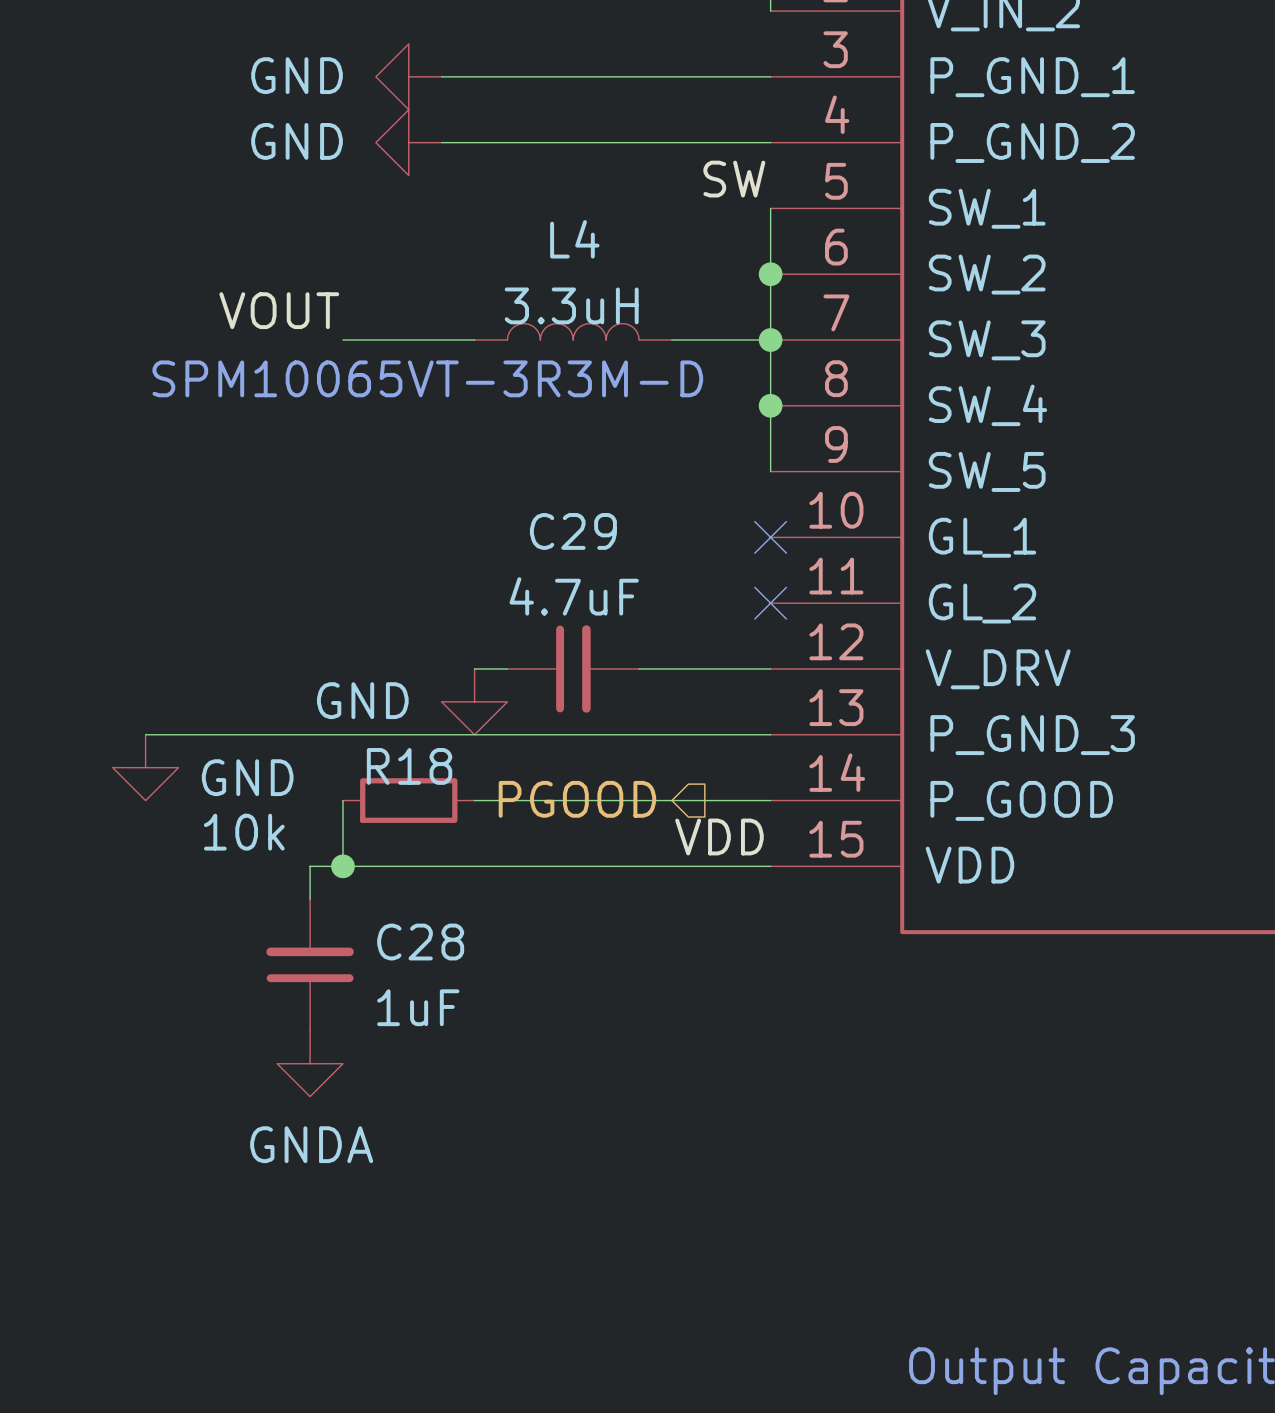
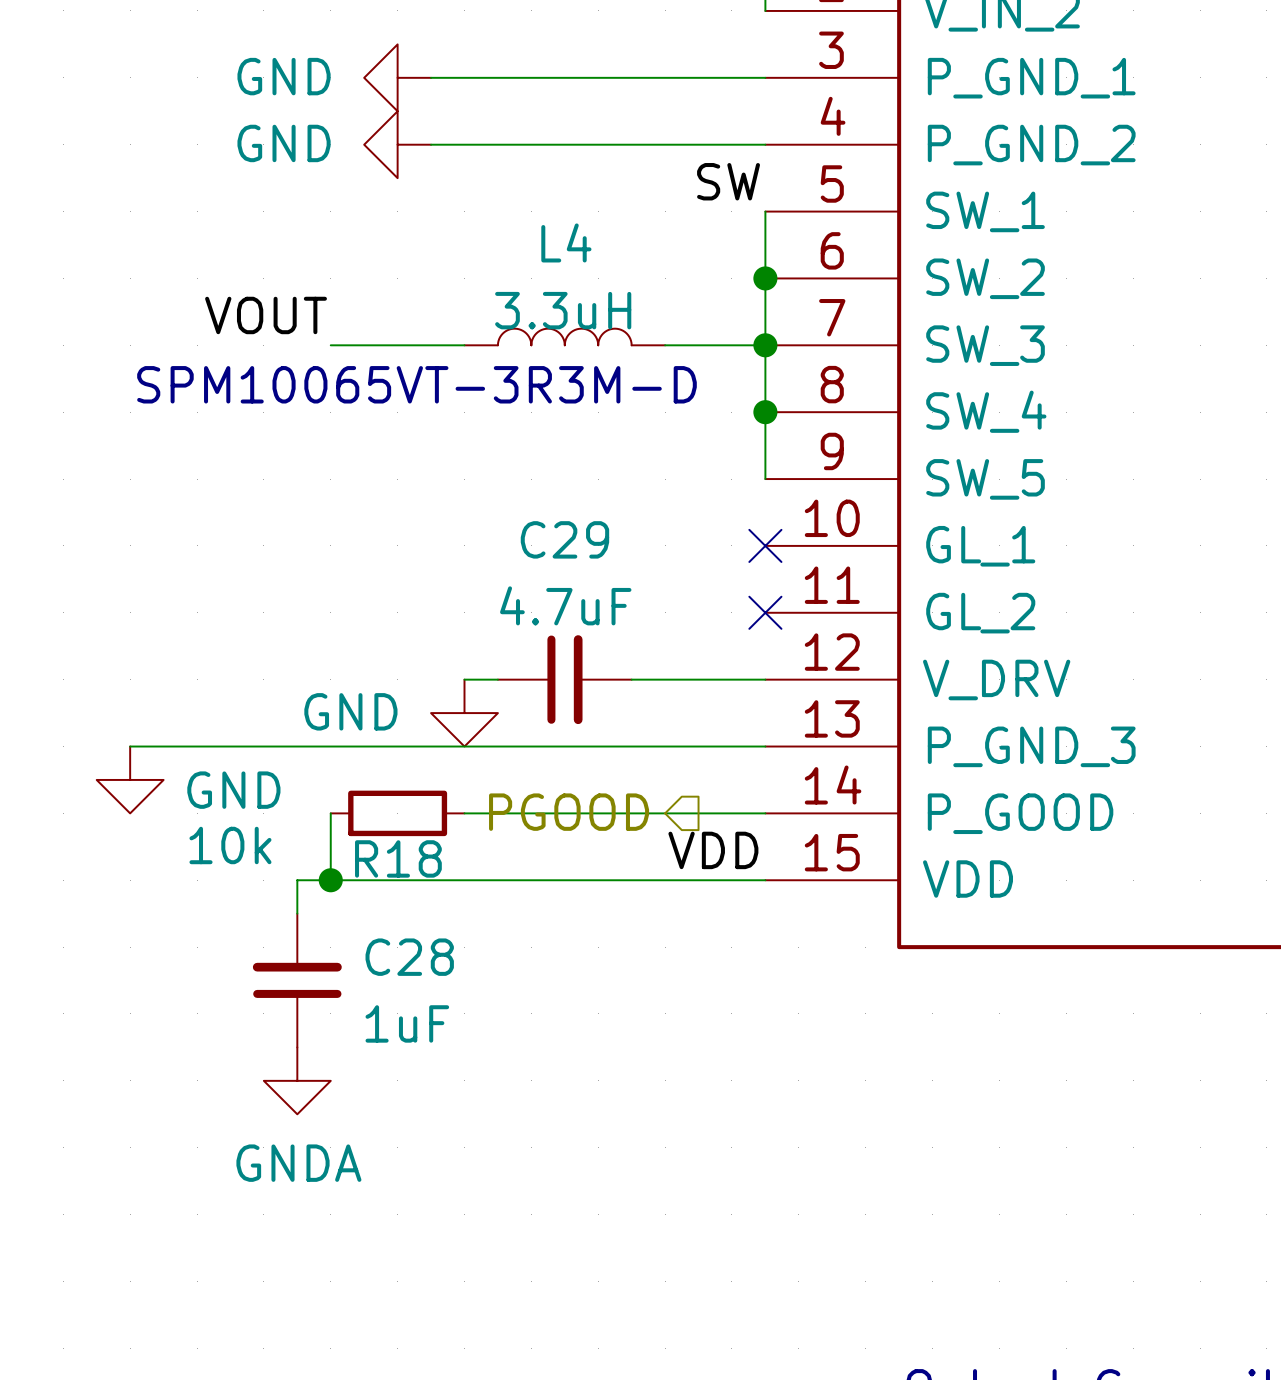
R18 name position: R18 (409, 766) -> R18 (398, 858)

